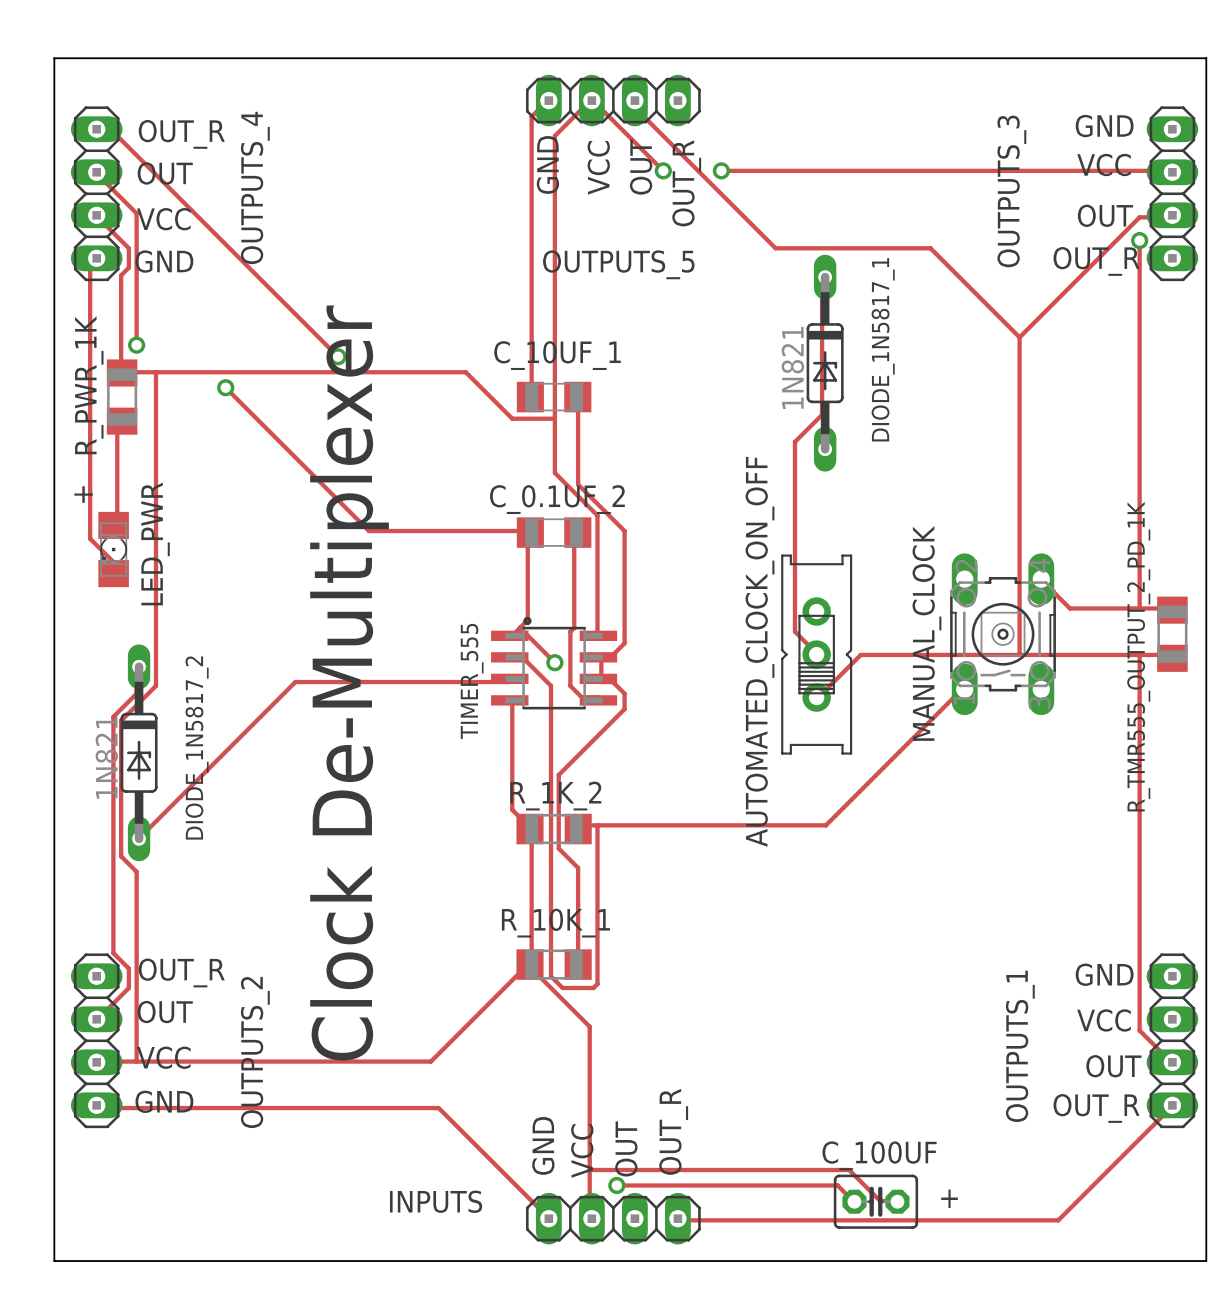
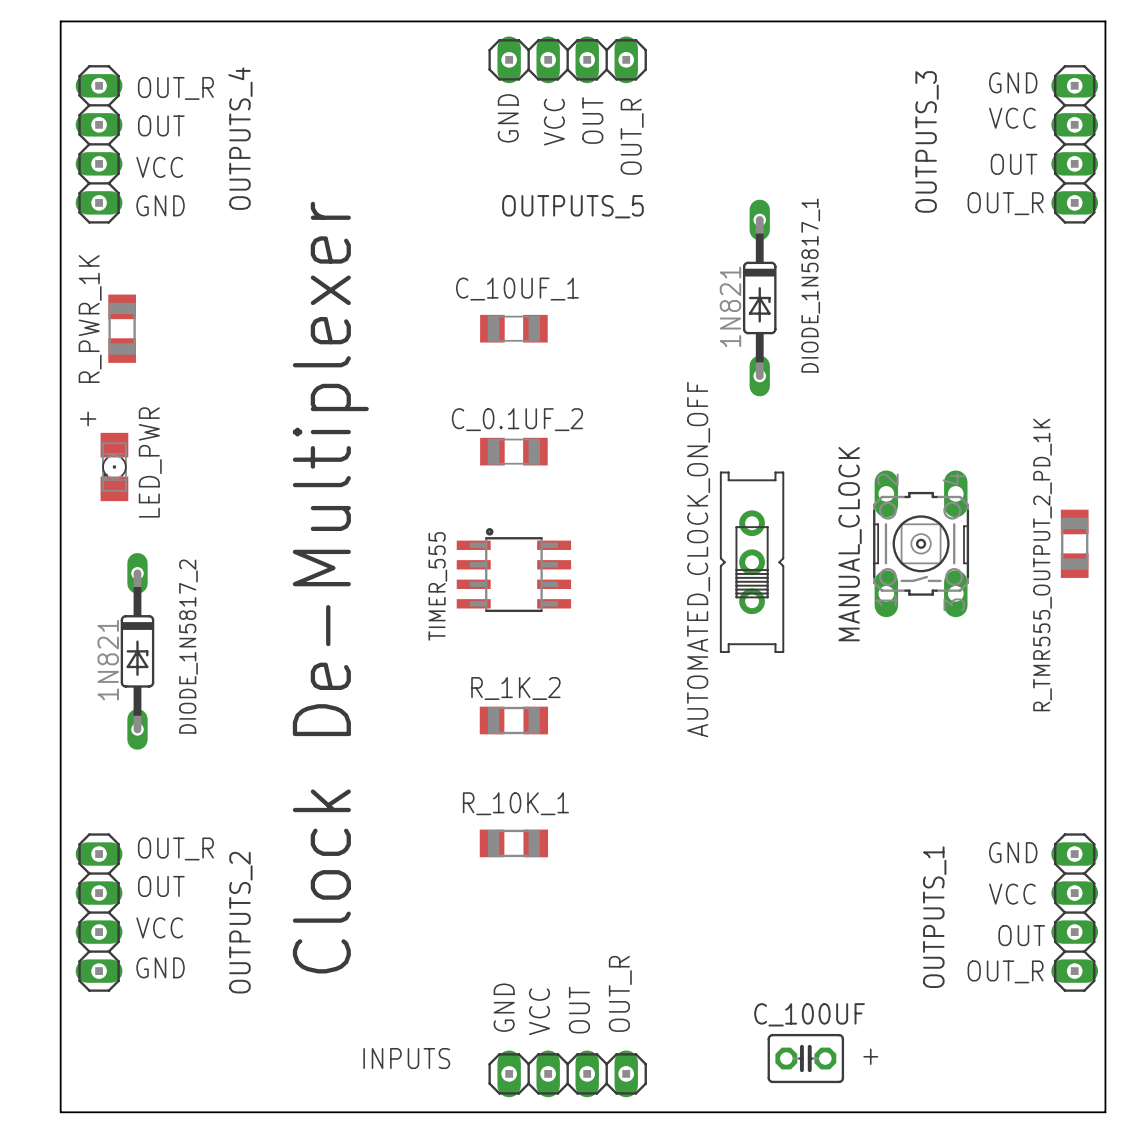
track: (548, 100) (531, 116) (530, 397) -> none
track: (634, 100) (636, 108) (775, 248) (930, 248) (1019, 337) -> none
track: (96, 129) (97, 132) (113, 132) (338, 356) -> none
track: (663, 170) (593, 101) (589, 101) (554, 136) (554, 472) (597, 515) (598, 635) -> none
via: (663, 170) -> none
track: (721, 170) (1172, 172) -> none
via: (721, 170) -> none
track: (96, 172) (136, 213) (136, 345) -> none
track: (96, 215) (128, 248) (128, 267) (121, 275) (122, 372) (465, 372) (512, 418) (554, 418) -> none
track: (1172, 215) (1170, 217) (1139, 217) (1019, 337) -> none
track: (1139, 240) (1139, 608) -> none
via: (1139, 240) -> none
track: (96, 258) (90, 263) (90, 538) (113, 562) (113, 573) -> none
track: (825, 277) (822, 279) (822, 414) (794, 441) (794, 631) (816, 654) -> none
track: (1019, 337) (1019, 654) -> none
via: (136, 345) -> none
via: (338, 356) -> none
track: (156, 372) (156, 685) (121, 720) (121, 856) (136, 871) (136, 1061) -> none
track: (225, 387) (368, 531) (527, 531) (530, 532) (527, 534) (527, 620) (509, 635) -> none
via: (225, 387) -> none
track: (577, 397) (578, 484) (624, 531) (624, 643) (612, 654) (601, 654) (598, 657) (601, 658) (601, 678) (598, 678) (601, 682) (612, 682) (624, 693) (624, 709) (558, 774) (558, 848) (578, 867) (578, 964) -> none
track: (122, 421) (117, 426) (117, 523) (113, 525) -> none
track: (577, 532) (574, 534) (574, 627) (570, 631) (570, 685) (581, 697) (597, 697) (598, 700) -> none
track: (1041, 579) (1069, 608) (1170, 608) (1172, 610) -> none
track: (520, 627) (554, 662) -> none
track: (1139, 654) (1139, 1030) (1172, 1062) -> none
track: (509, 657) (523, 658) (551, 685) (551, 976) (562, 987) (593, 987) (597, 984) (597, 825) -> none
track: (1172, 658) (1170, 654) (860, 654) (816, 697) -> none
via: (554, 662) -> none
track: (139, 666) (136, 670) (136, 693) (113, 716) (113, 953) (128, 968) (128, 987) (96, 1019) -> none
track: (509, 678) (508, 682) (295, 682) (139, 838) -> none
track: (964, 689) (961, 689) (825, 825) (581, 825) (578, 829) -> none
track: (509, 700) (512, 701) (512, 809) (531, 829) (531, 960) (527, 964) -> none
track: (527, 964) (589, 1026) (589, 1216) (591, 1218) -> none
track: (527, 964) (430, 1061) (96, 1062) -> none
track: (96, 1105) (97, 1108) (438, 1108) (548, 1218) -> none
track: (1172, 1105) (1058, 1220) (678, 1220) (677, 1218) -> none
track: (589, 1170) (849, 1170) (880, 1200) (897, 1201) -> none
track: (616, 1185) (837, 1185) (854, 1201) -> none
via: (616, 1185) -> none

